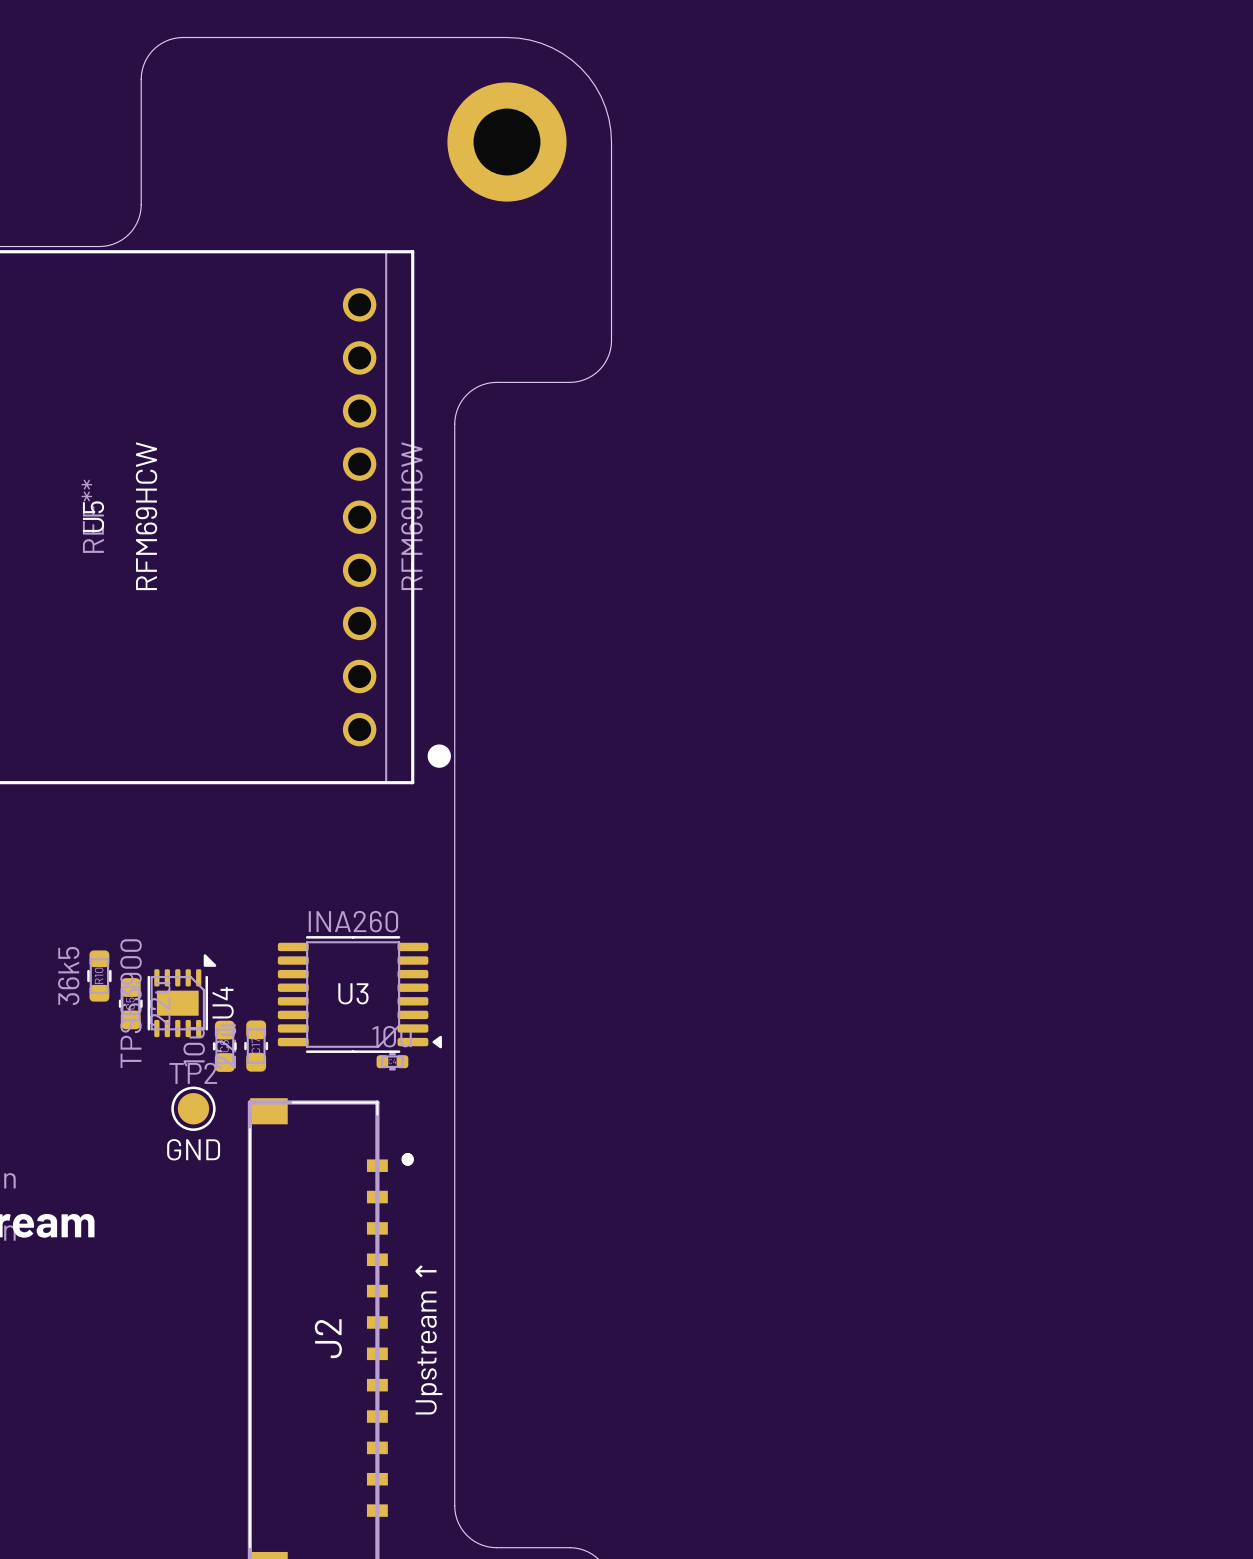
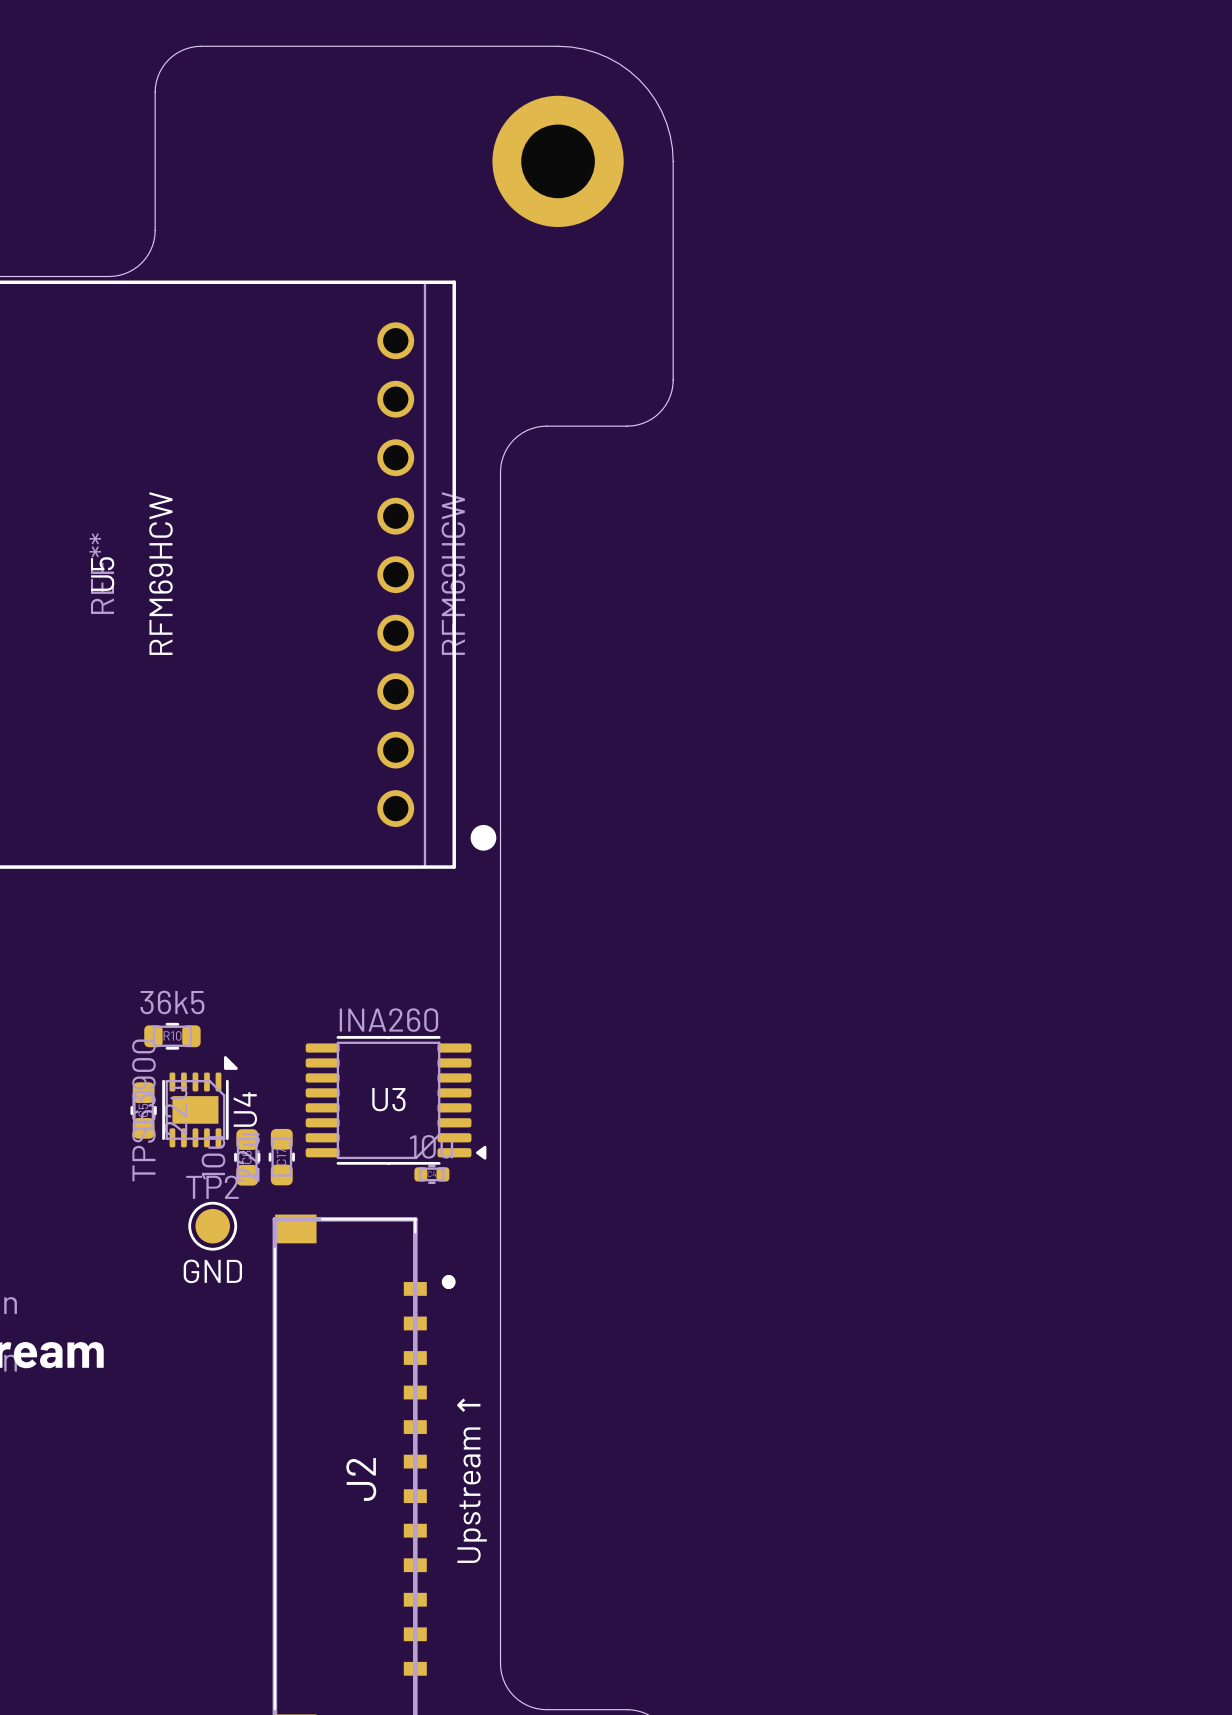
R10 rotation: 0° (99, 976) -> 90° clockwise (172, 1036)
R10 position: (99, 976) -> (172, 1036)

